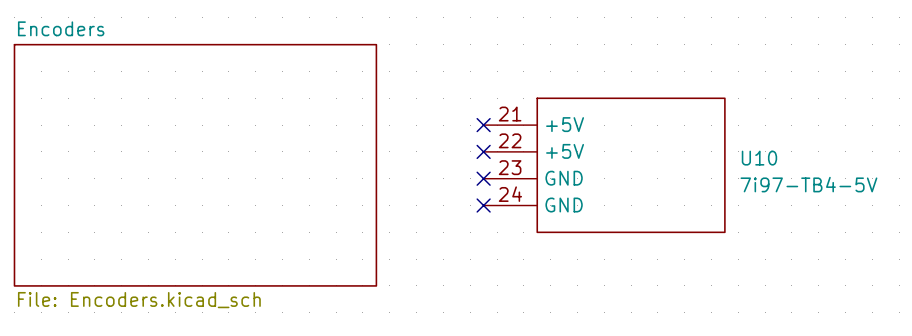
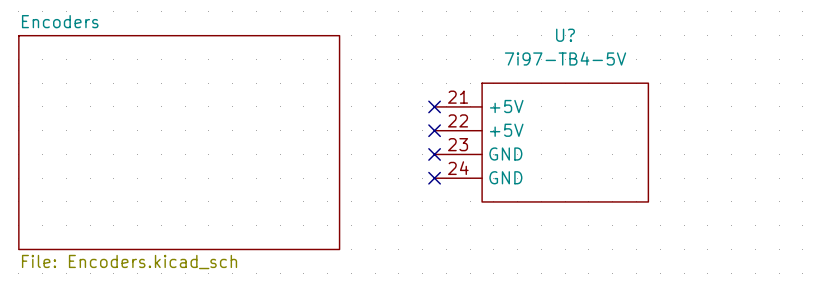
U10 name: U10 (759, 158) -> U? (565, 35)
U10 value position: 7i97-TB4-5V (808, 184) -> 7i97-TB4-5V (565, 58)

